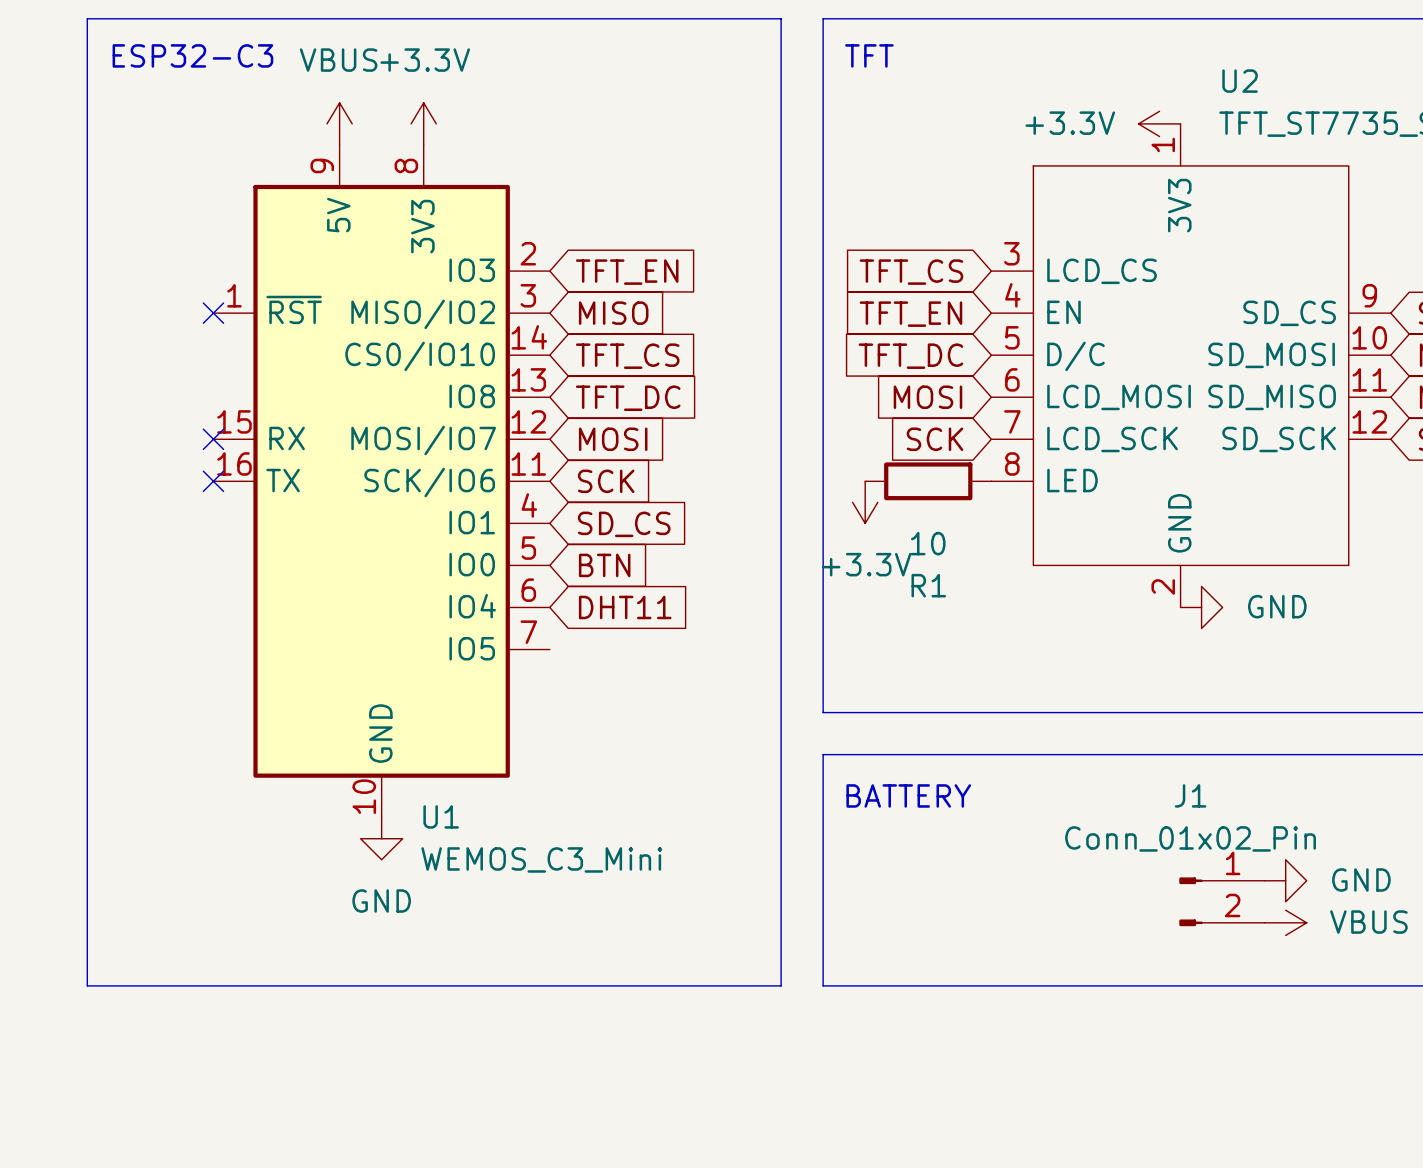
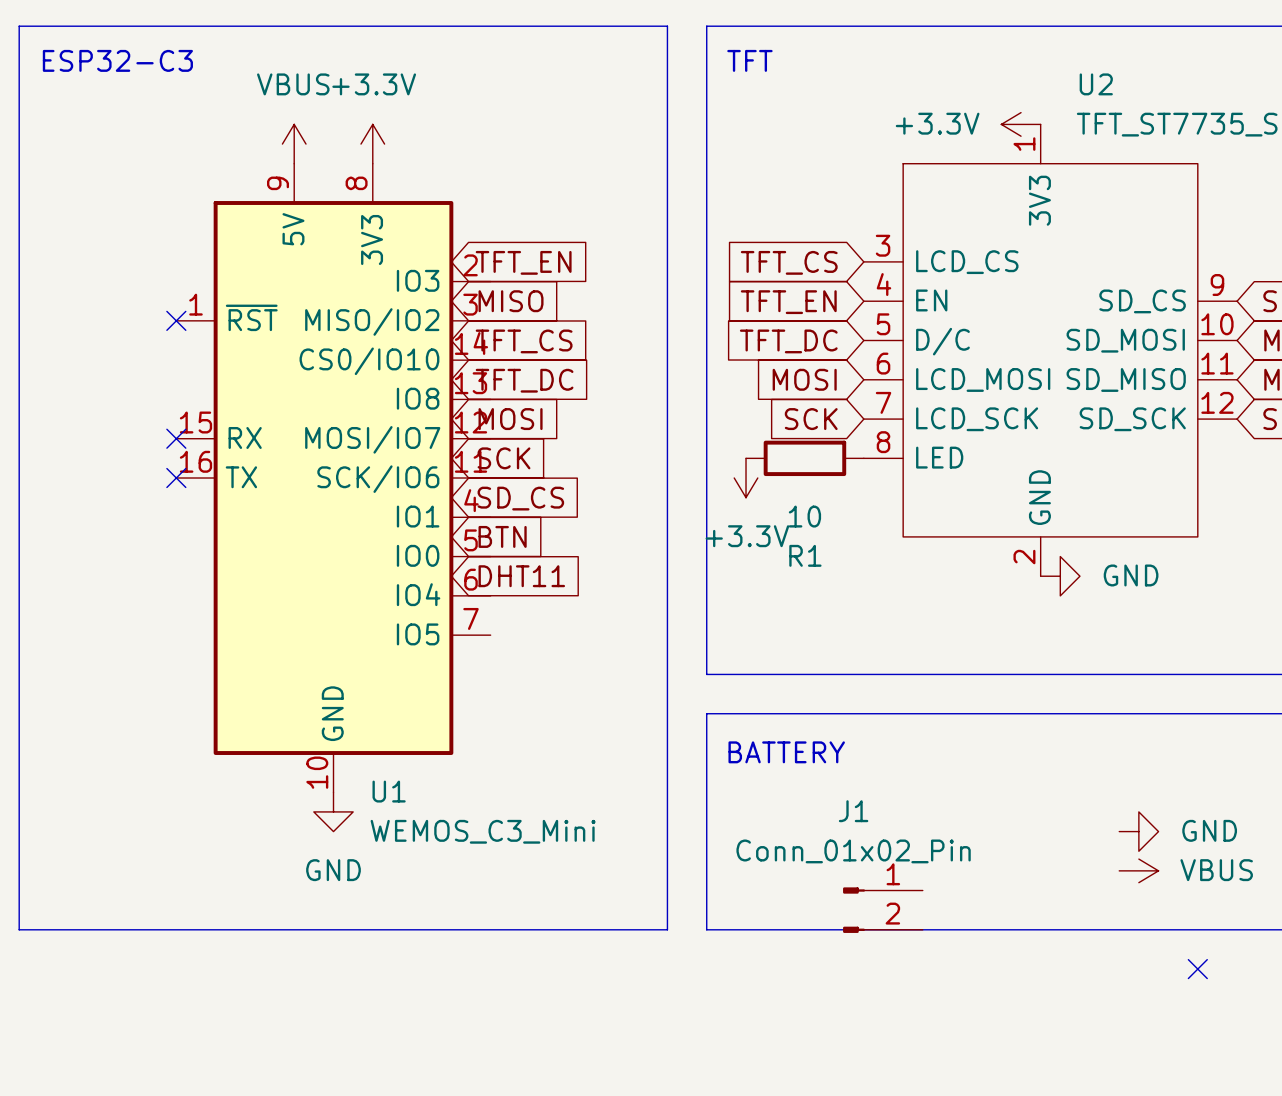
power symbol position: VBUS (339, 123) -> VBUS (294, 144)
power symbol position: +3.3V (423, 123) -> +3.3V (372, 144)
no-connect mark position: (213, 313) -> (176, 320)
no-connect mark: (213, 439) -> none
no-connect mark: none -> (176, 438)
no-connect mark: (213, 481) -> none
U1 position: (381, 481) -> (333, 478)
no-connect mark: none -> (176, 478)
power symbol position: GND (381, 838) -> GND (333, 811)
J1 position: (1221, 901) -> (882, 910)
no-connect mark: none -> (1197, 969)

